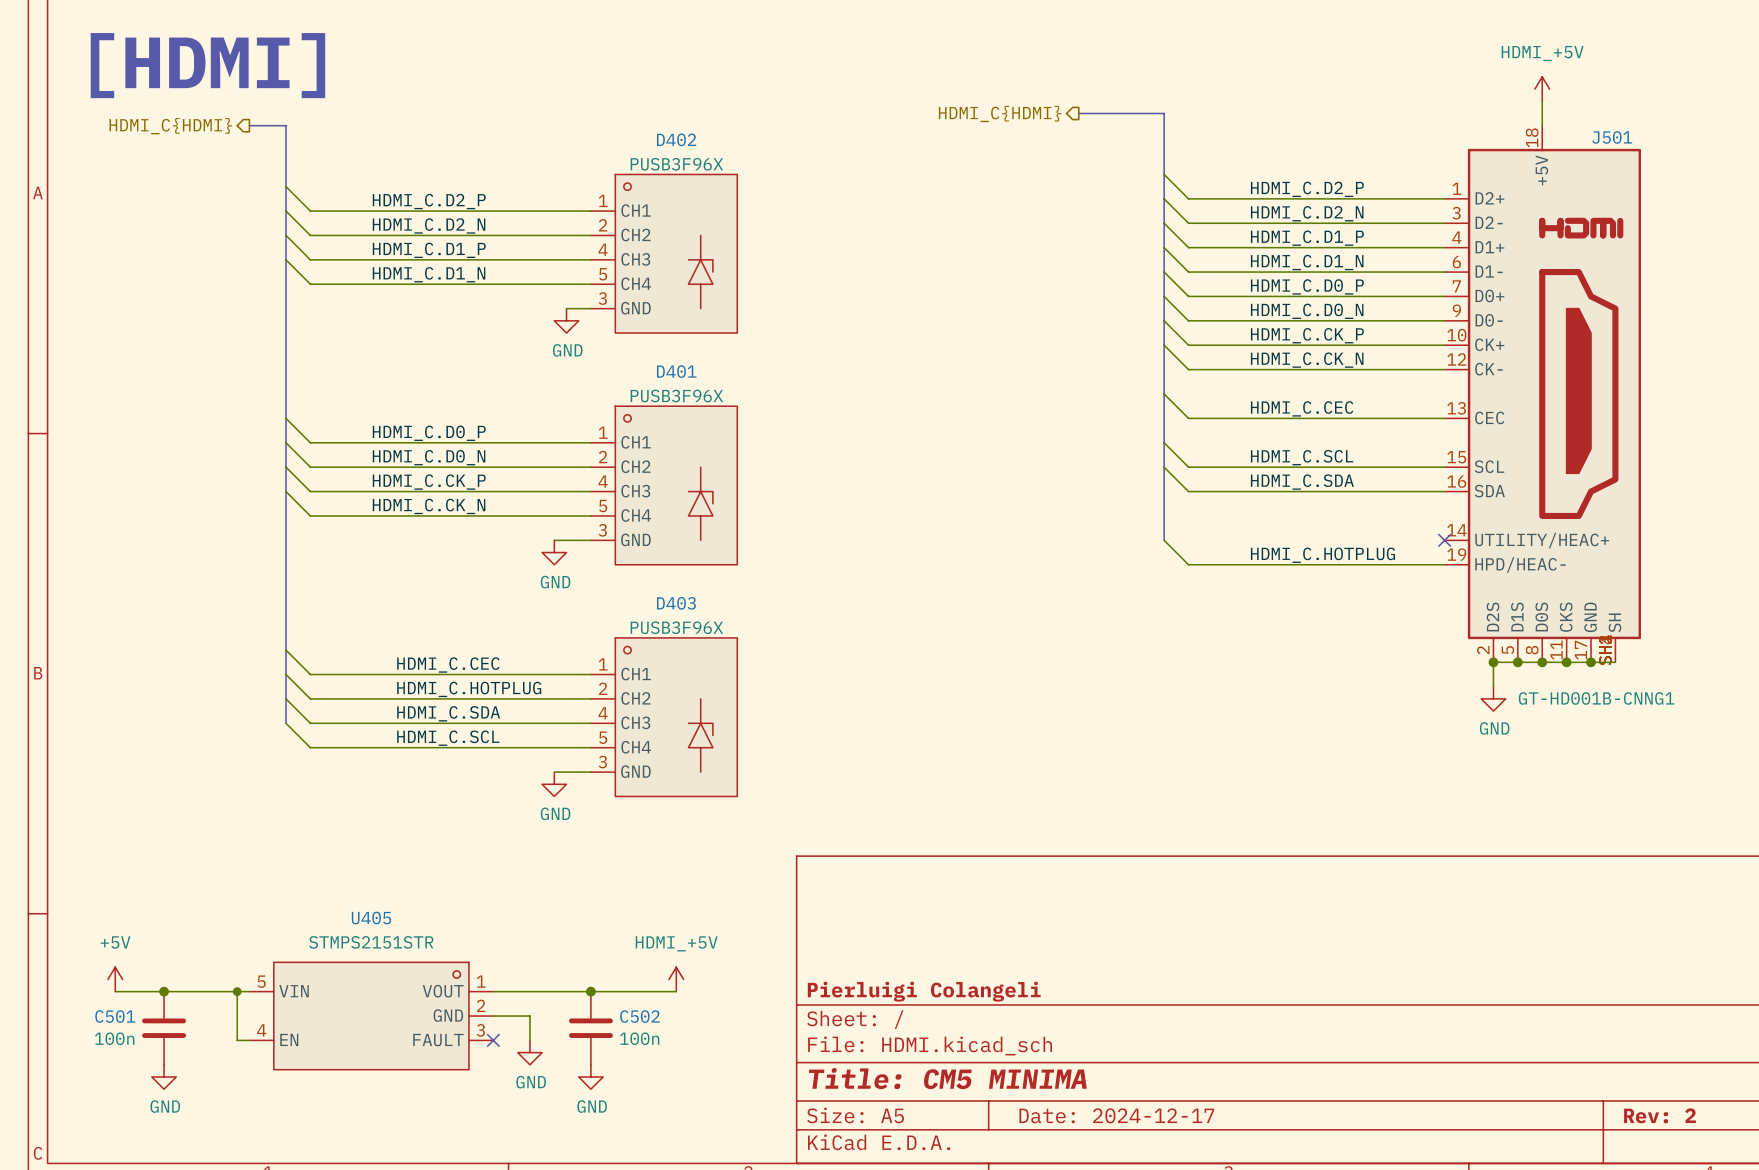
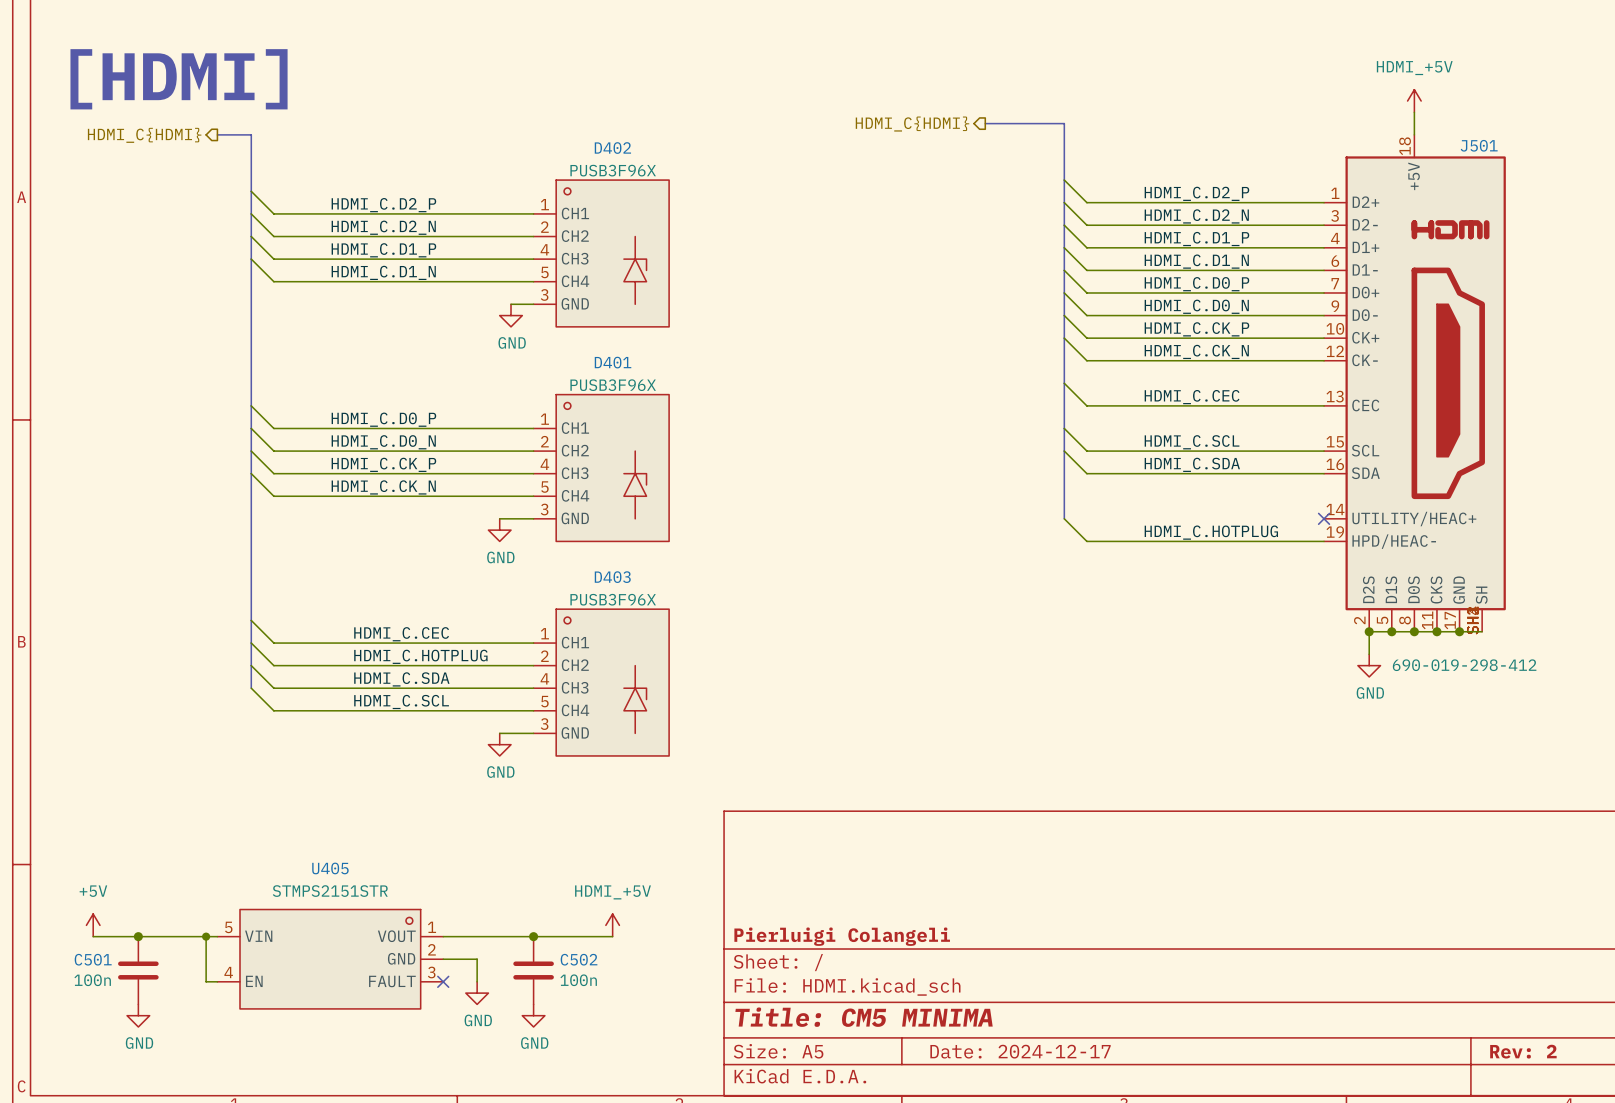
J501 value: GT-HD001B-CNNG1 (1596, 698) -> 690-019-298-412 (1464, 665)

